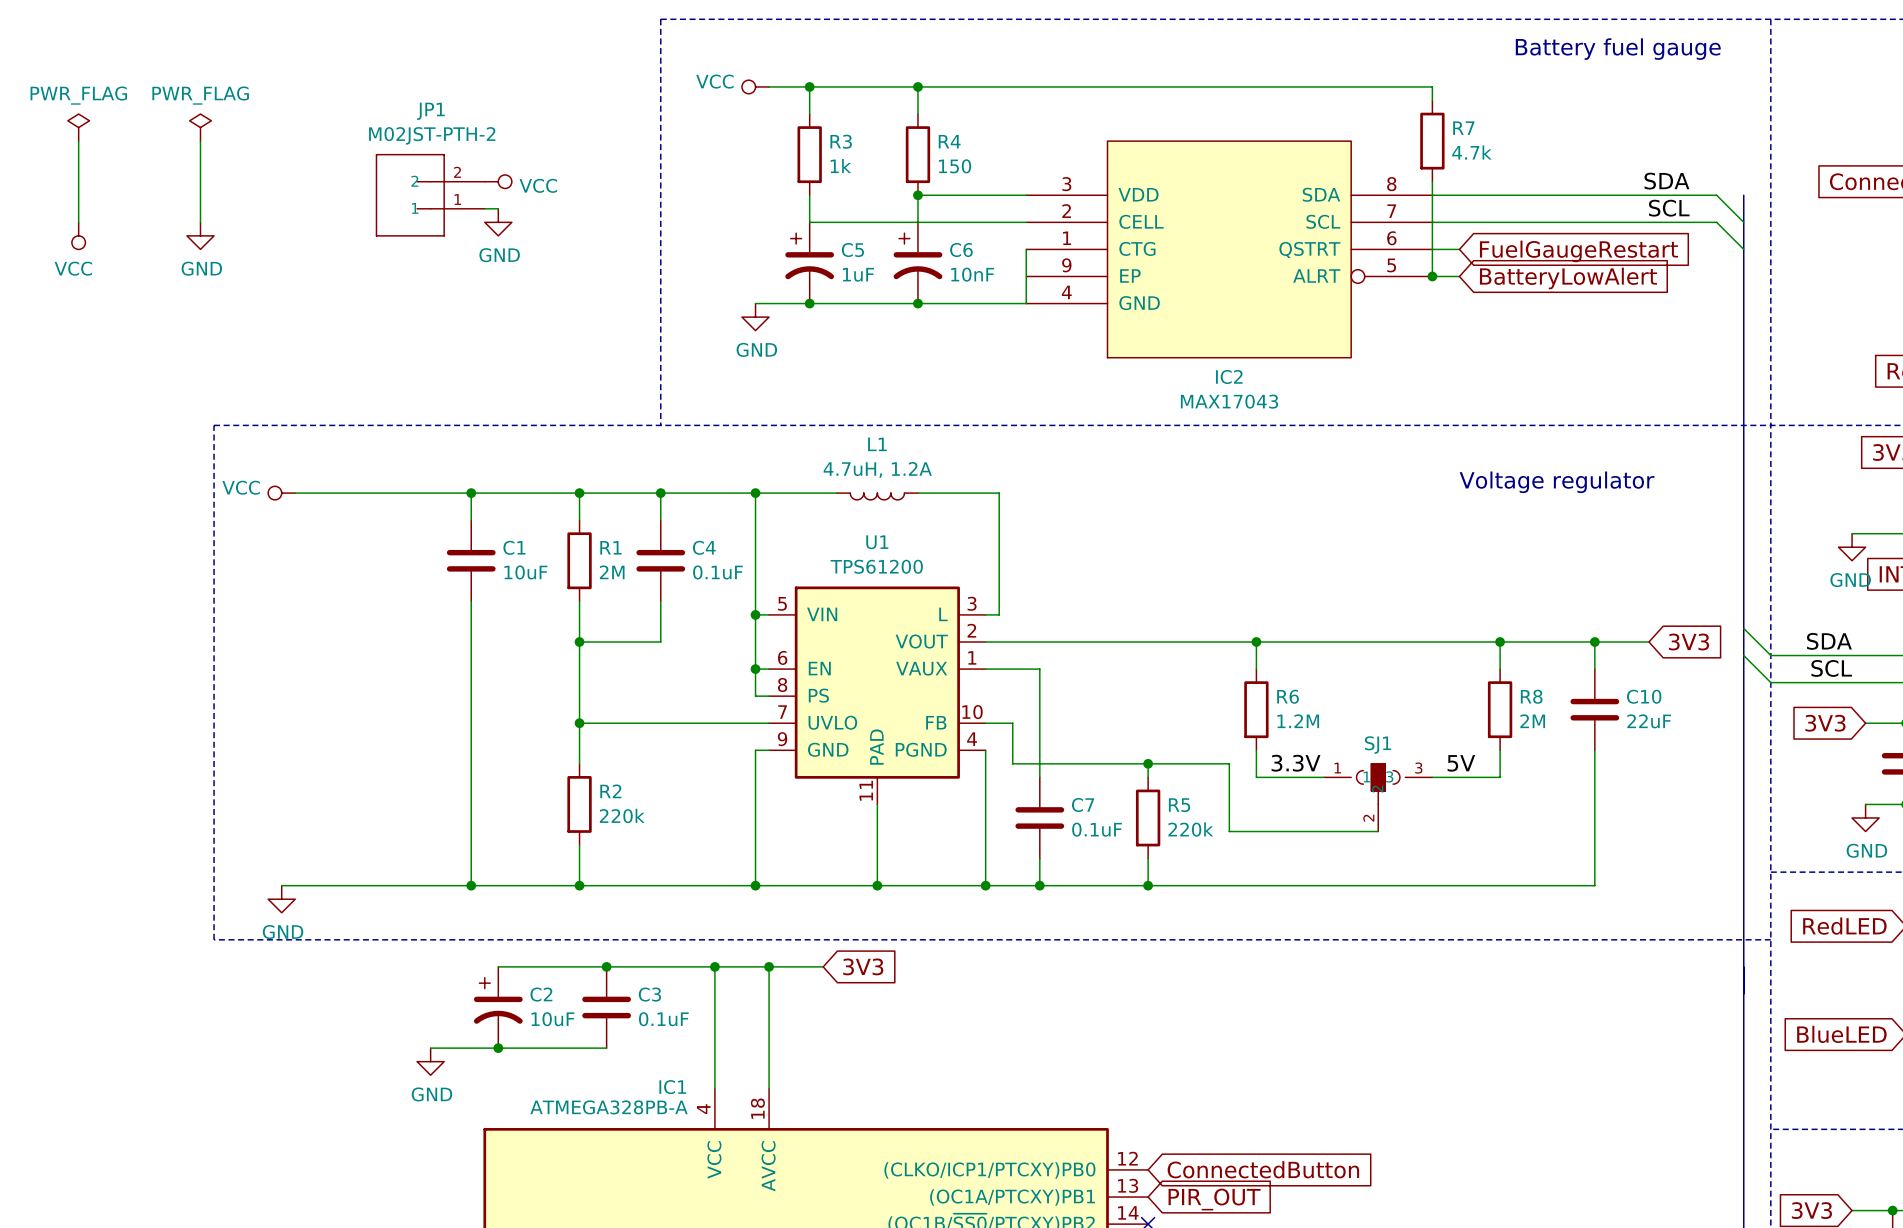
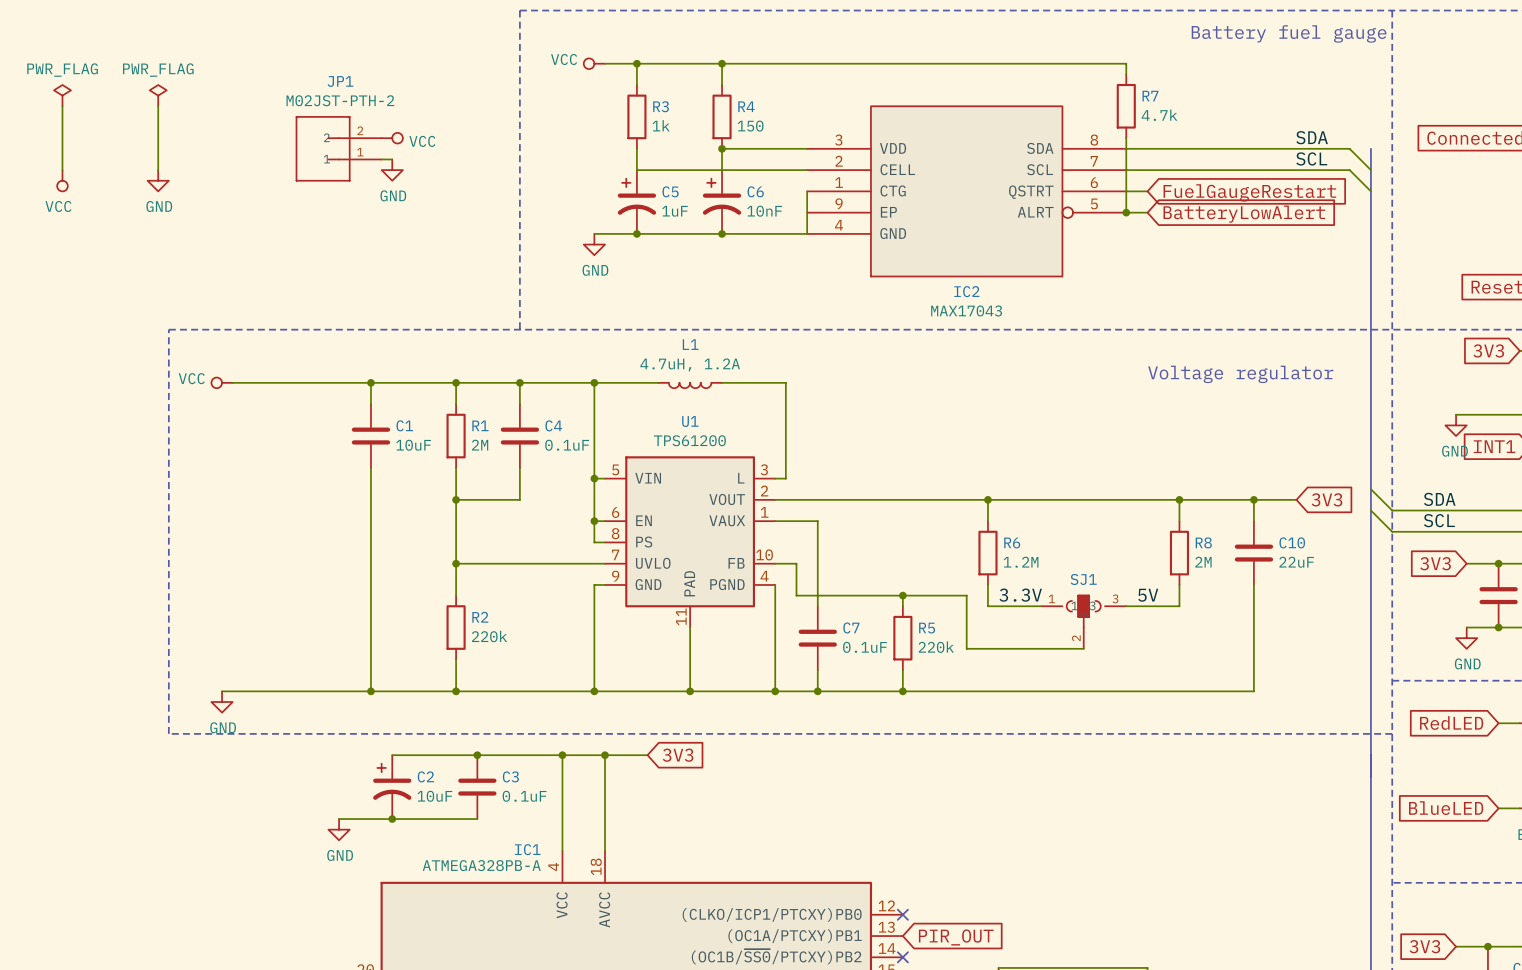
no-connect mark: none -> (902, 914)
global label: ConnectedButton (1263, 1169) -> none

